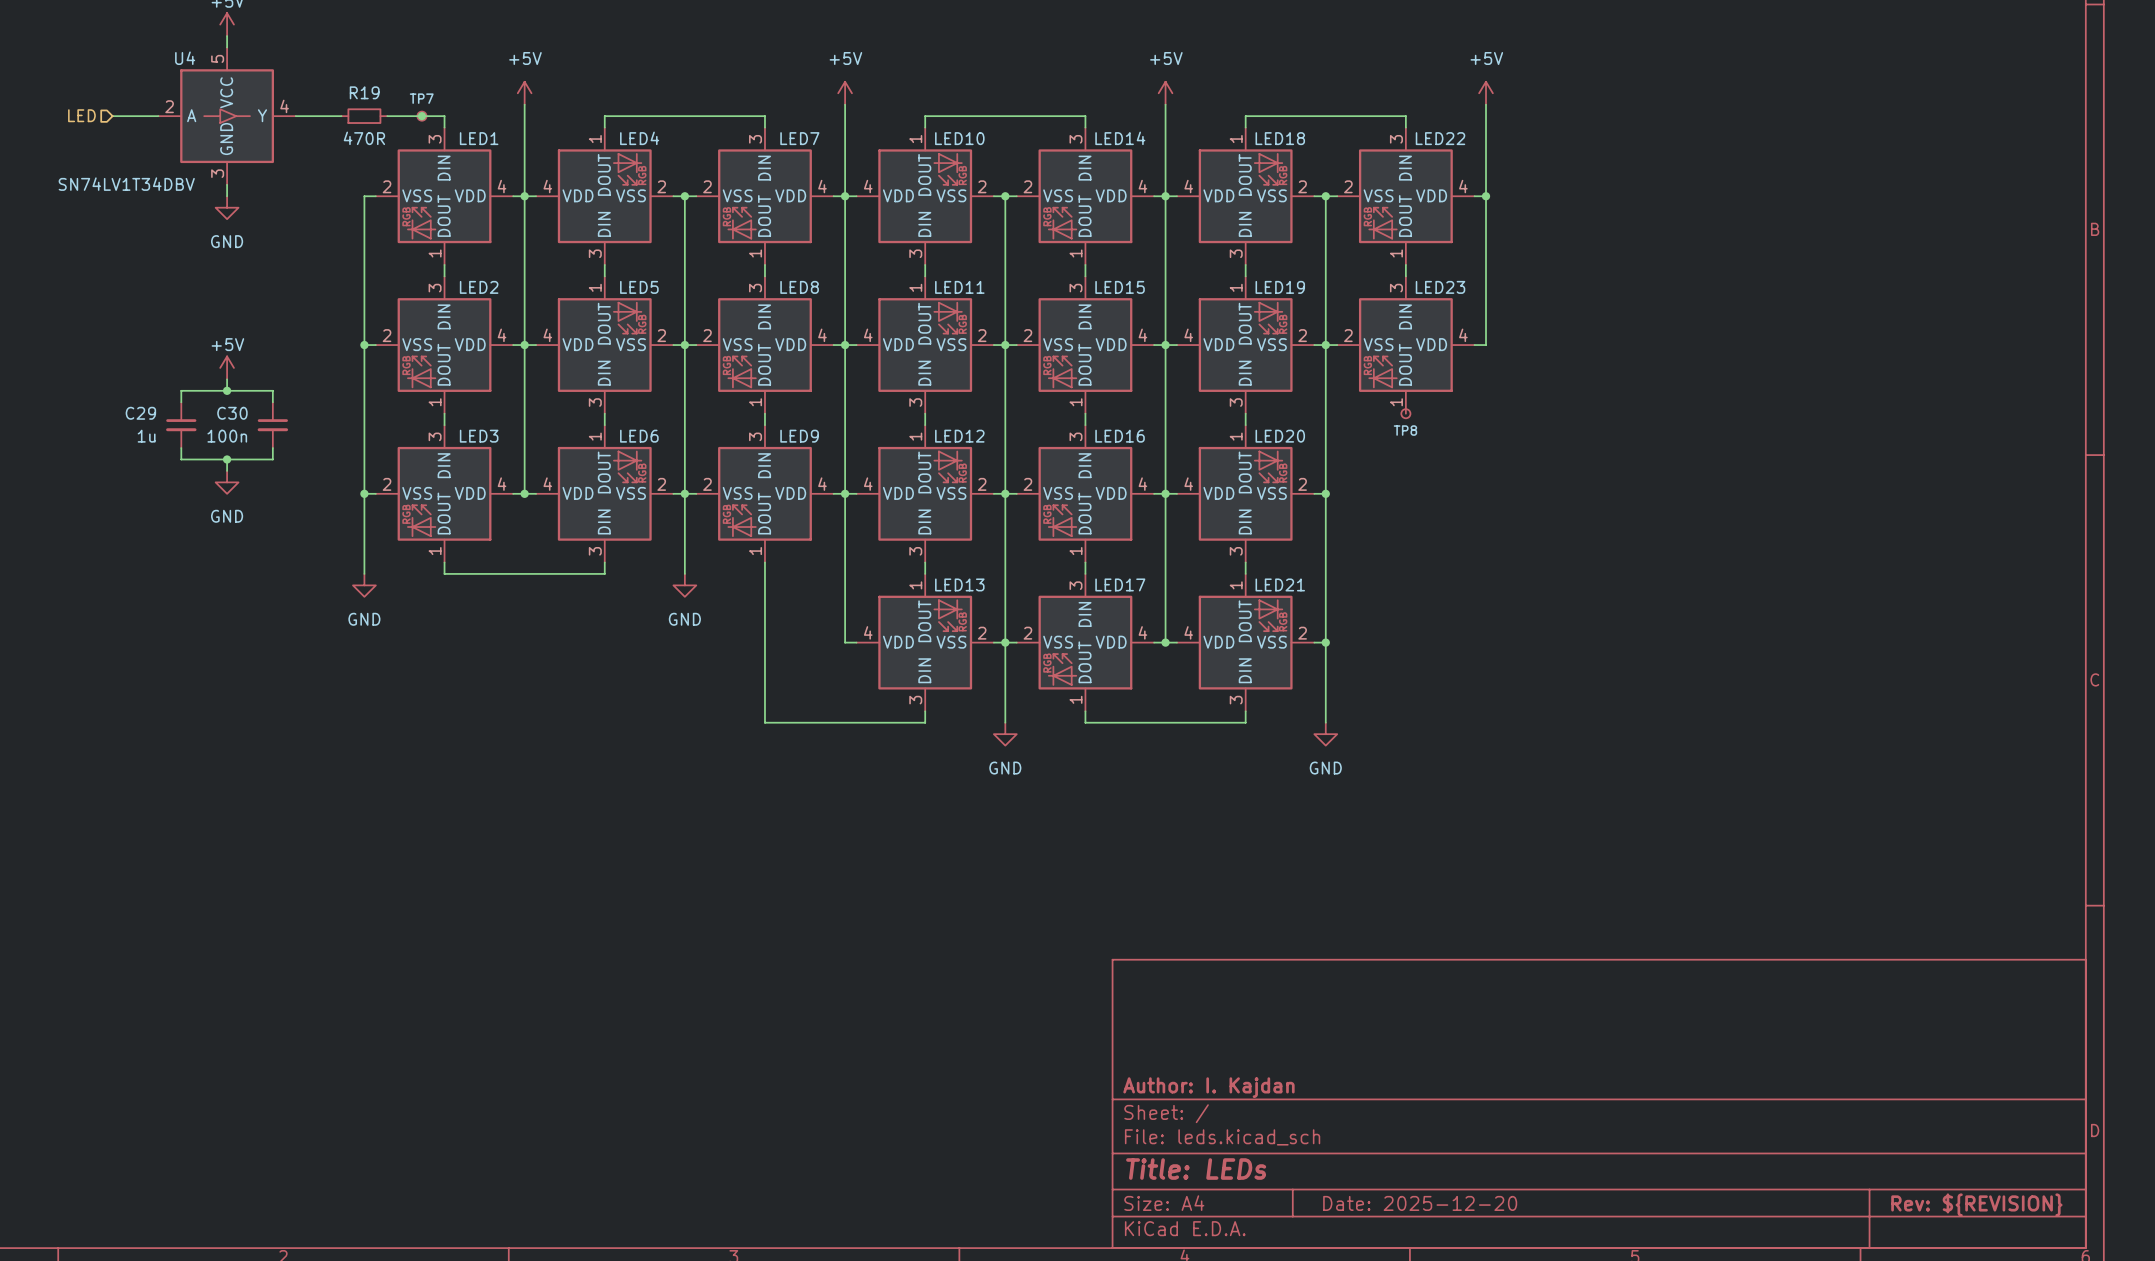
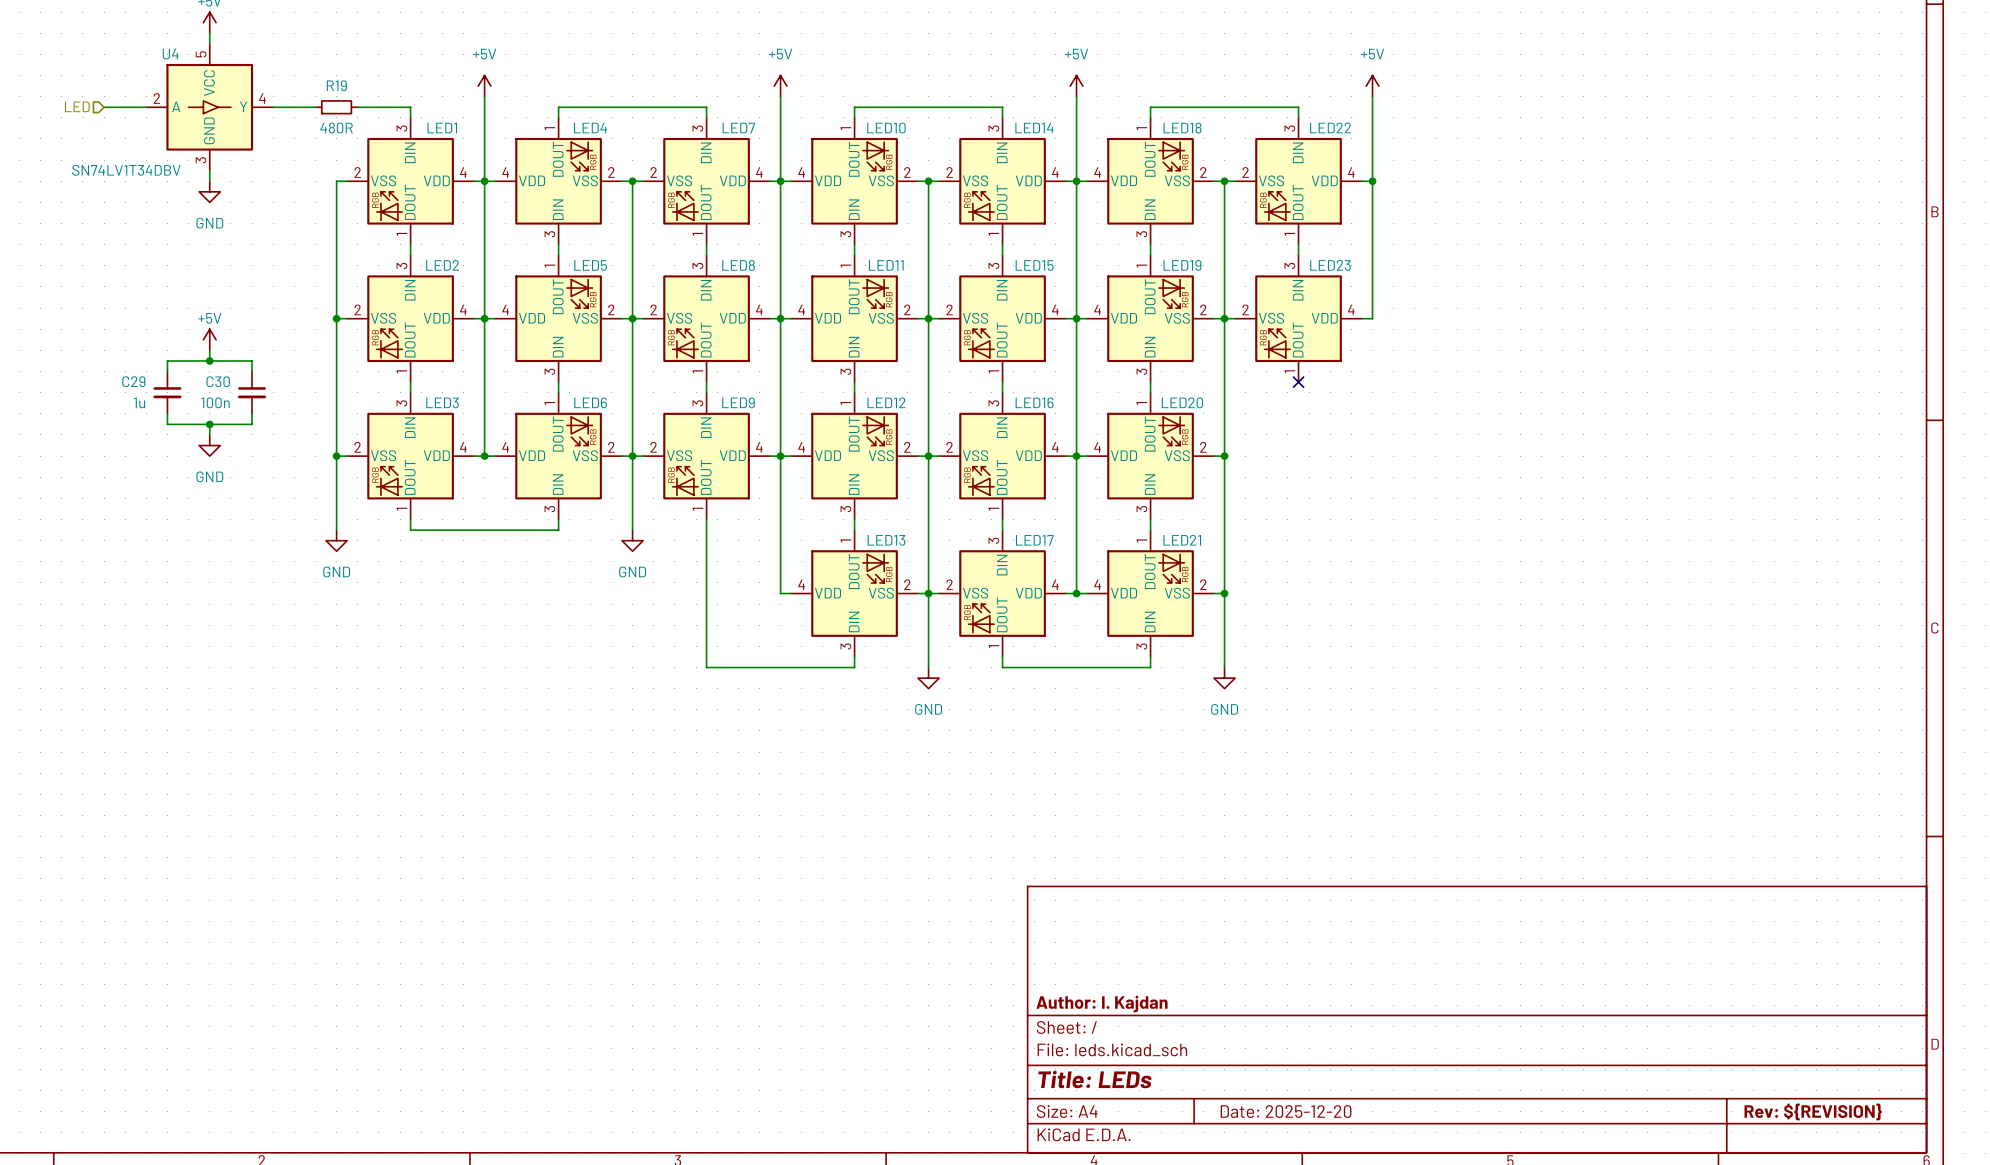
junction: (421, 116) -> none
TP7: (421, 116) -> none
R19 value: 470R (364, 138) -> 480R (336, 128)
TP8: (1405, 413) -> none
no-connect mark: none -> (1298, 382)

